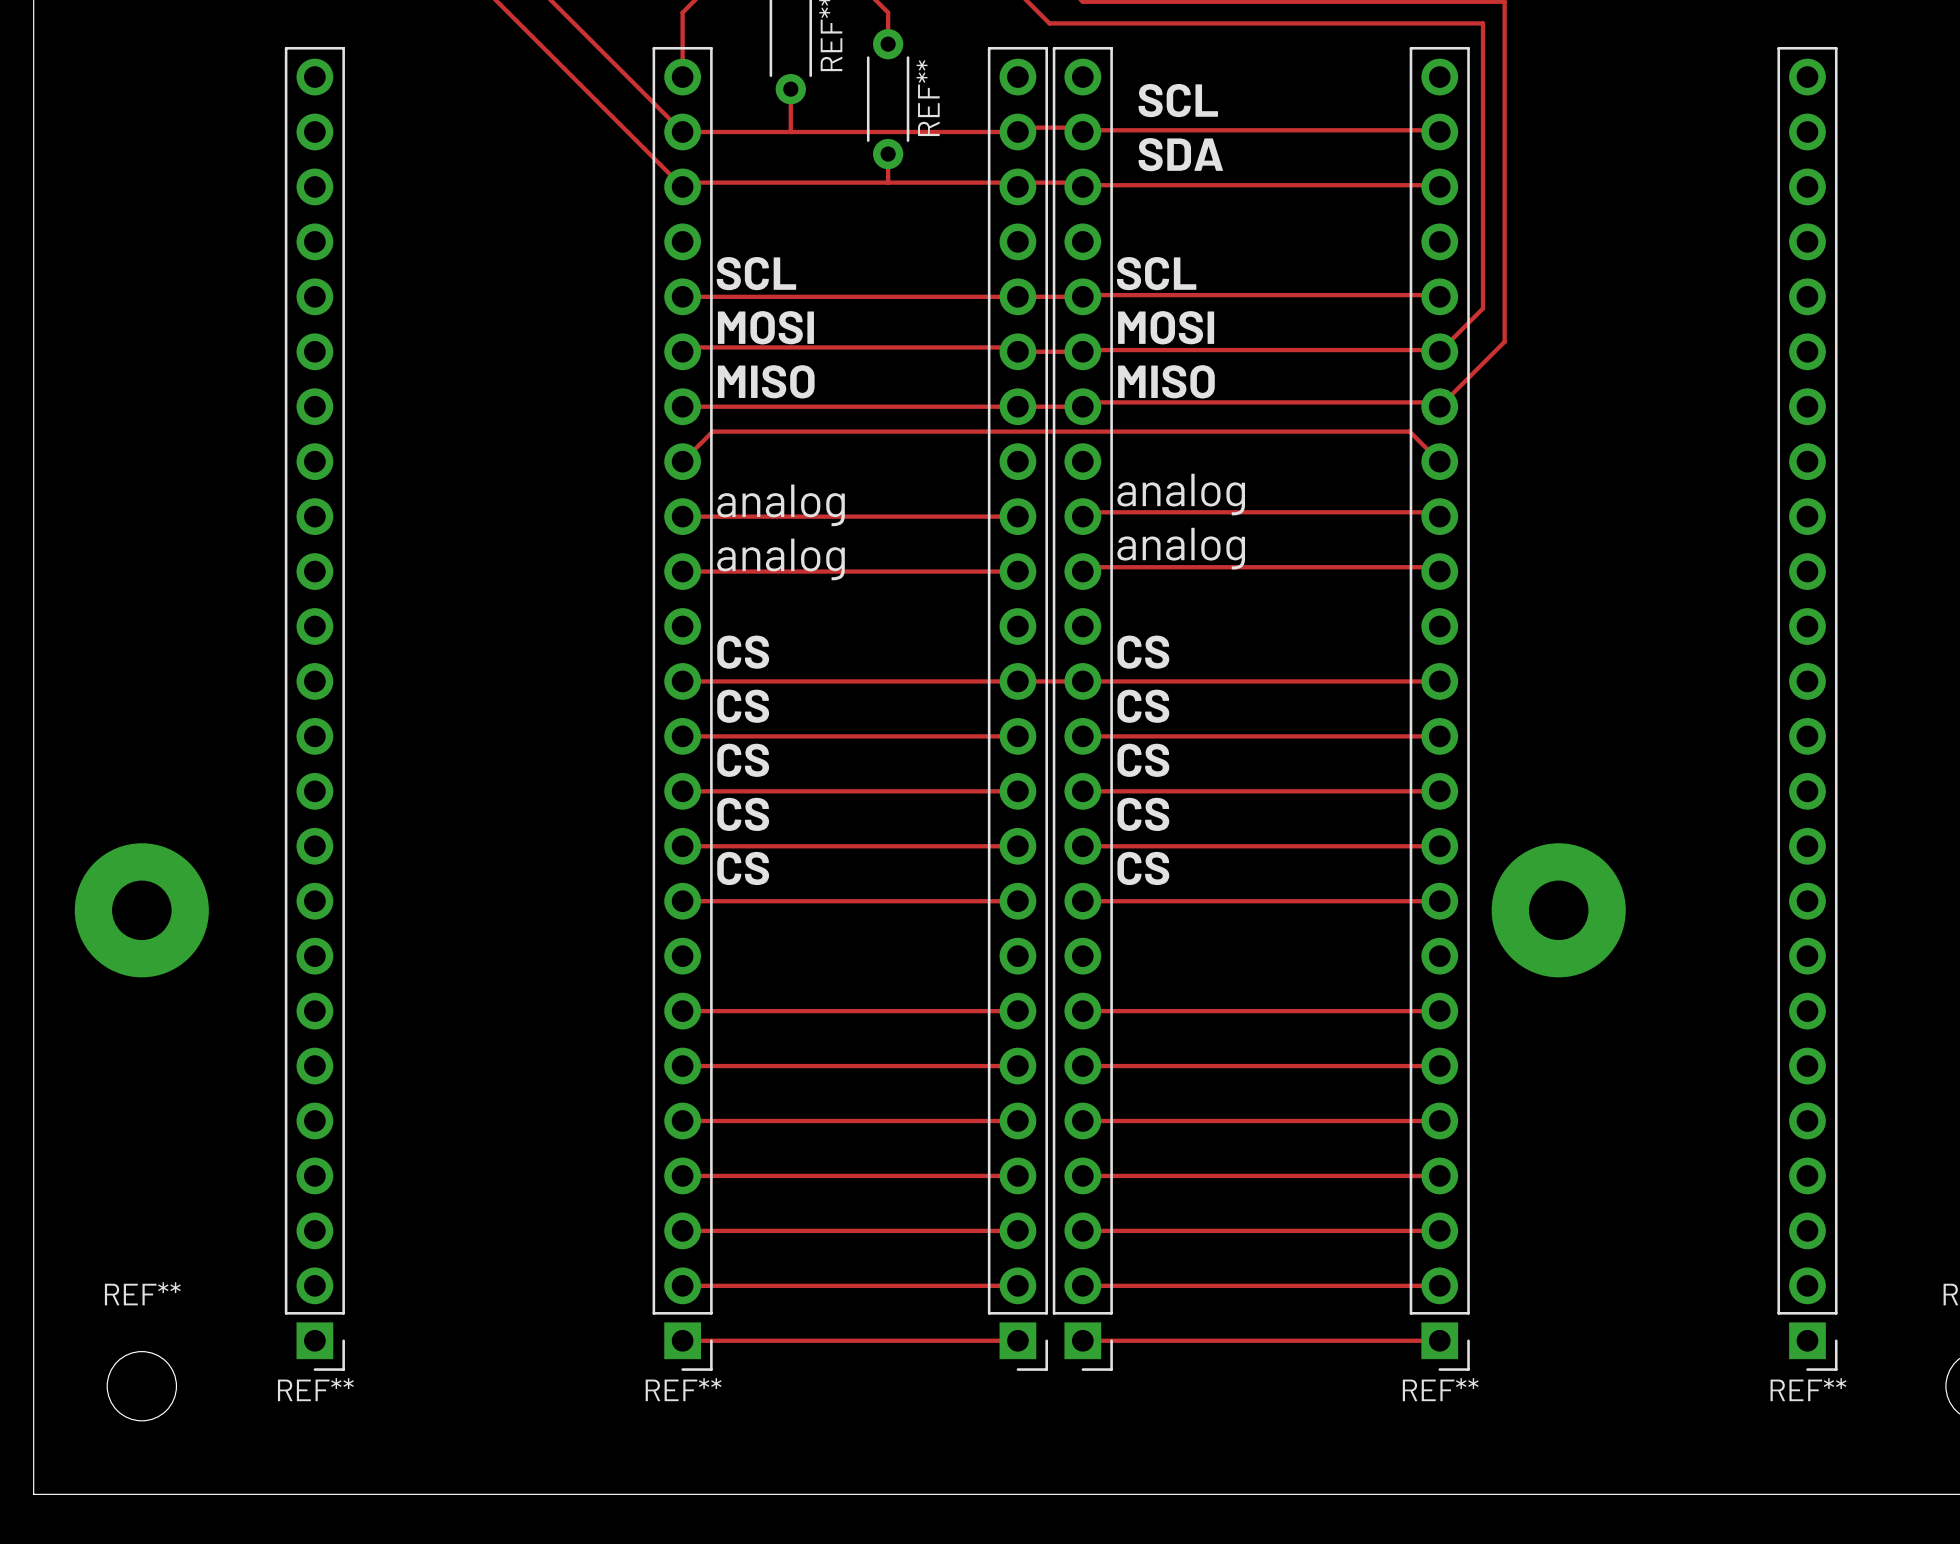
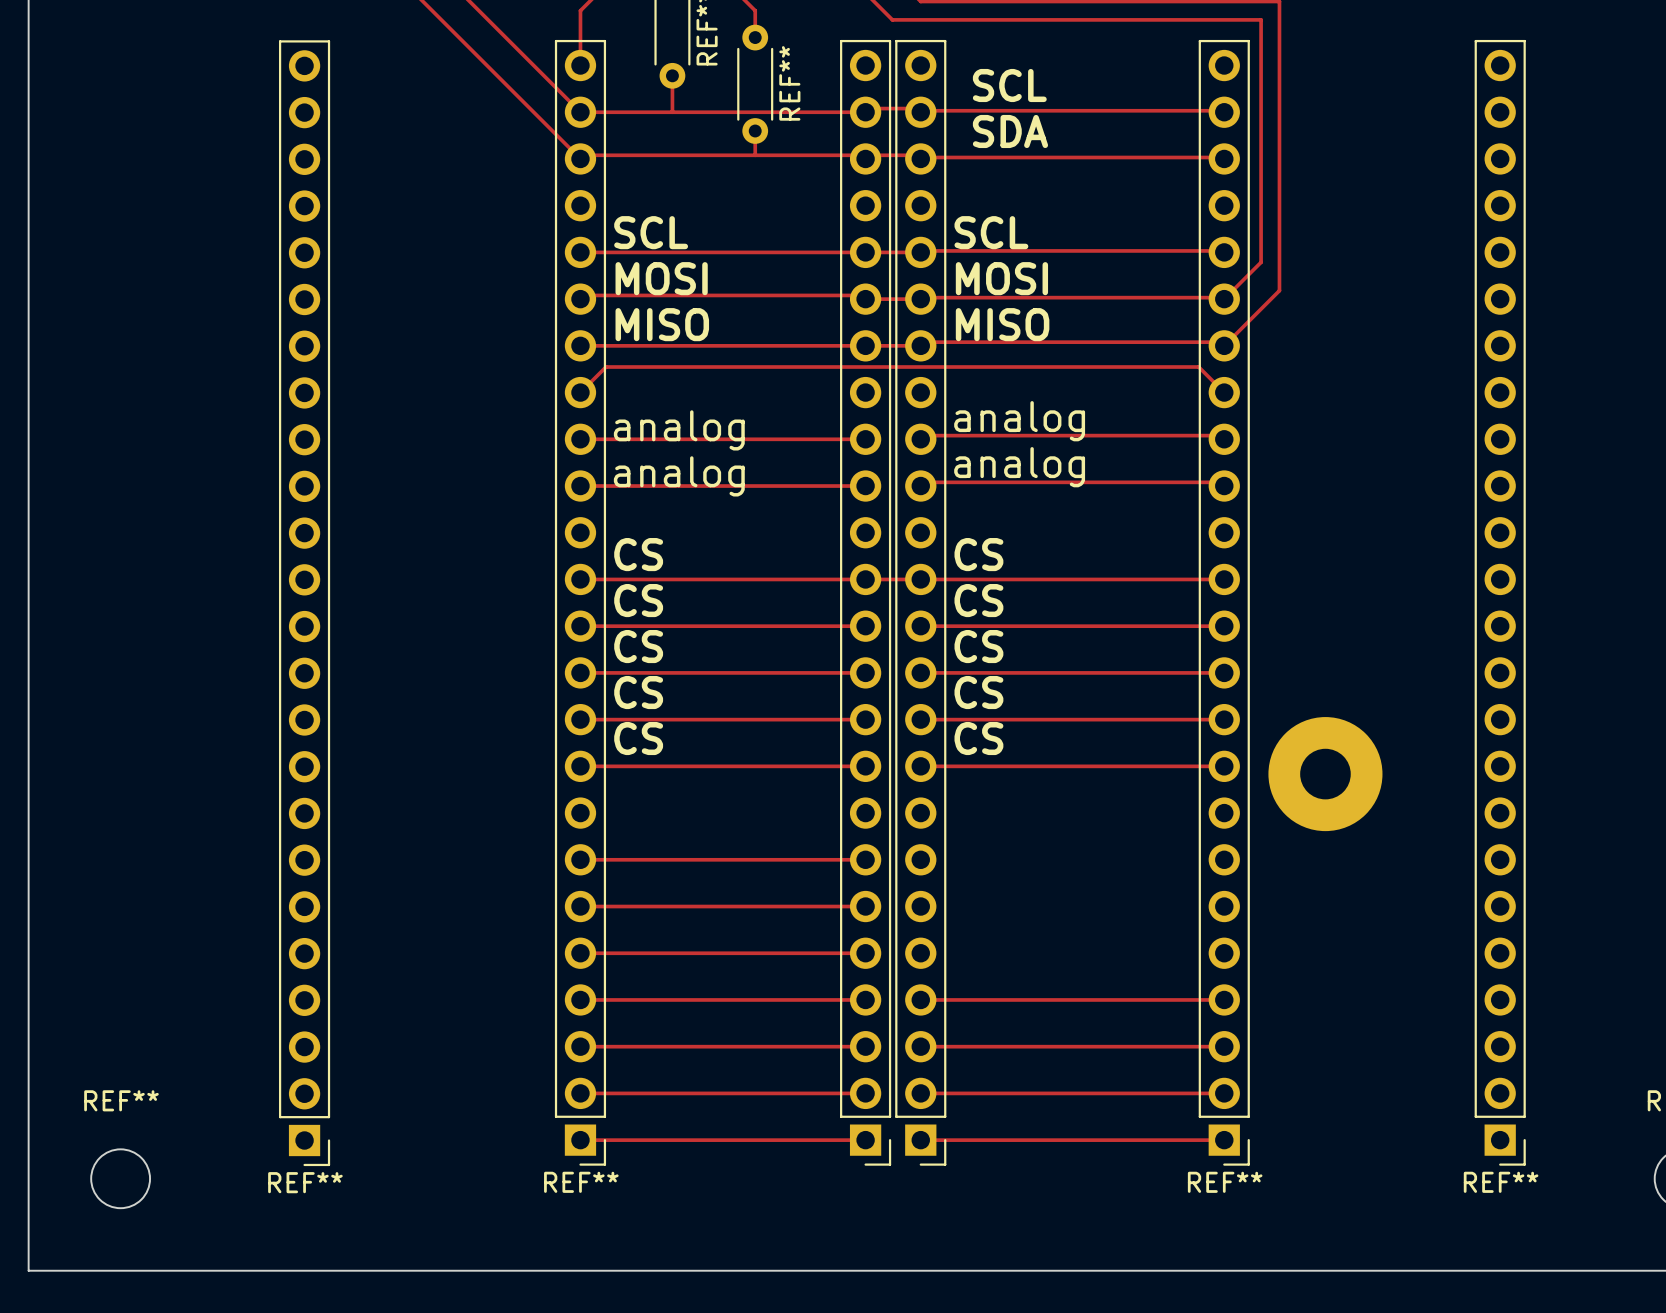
REF** position: (314, 708) -> (304, 603)
REF** position: (1807, 708) -> (1500, 602)
part: (141, 910) -> none
top track: (1082, 1011) (1439, 1011) -> none
top track: (1082, 1066) (1439, 1066) -> none
top track: (1082, 1121) (1439, 1121) -> none

